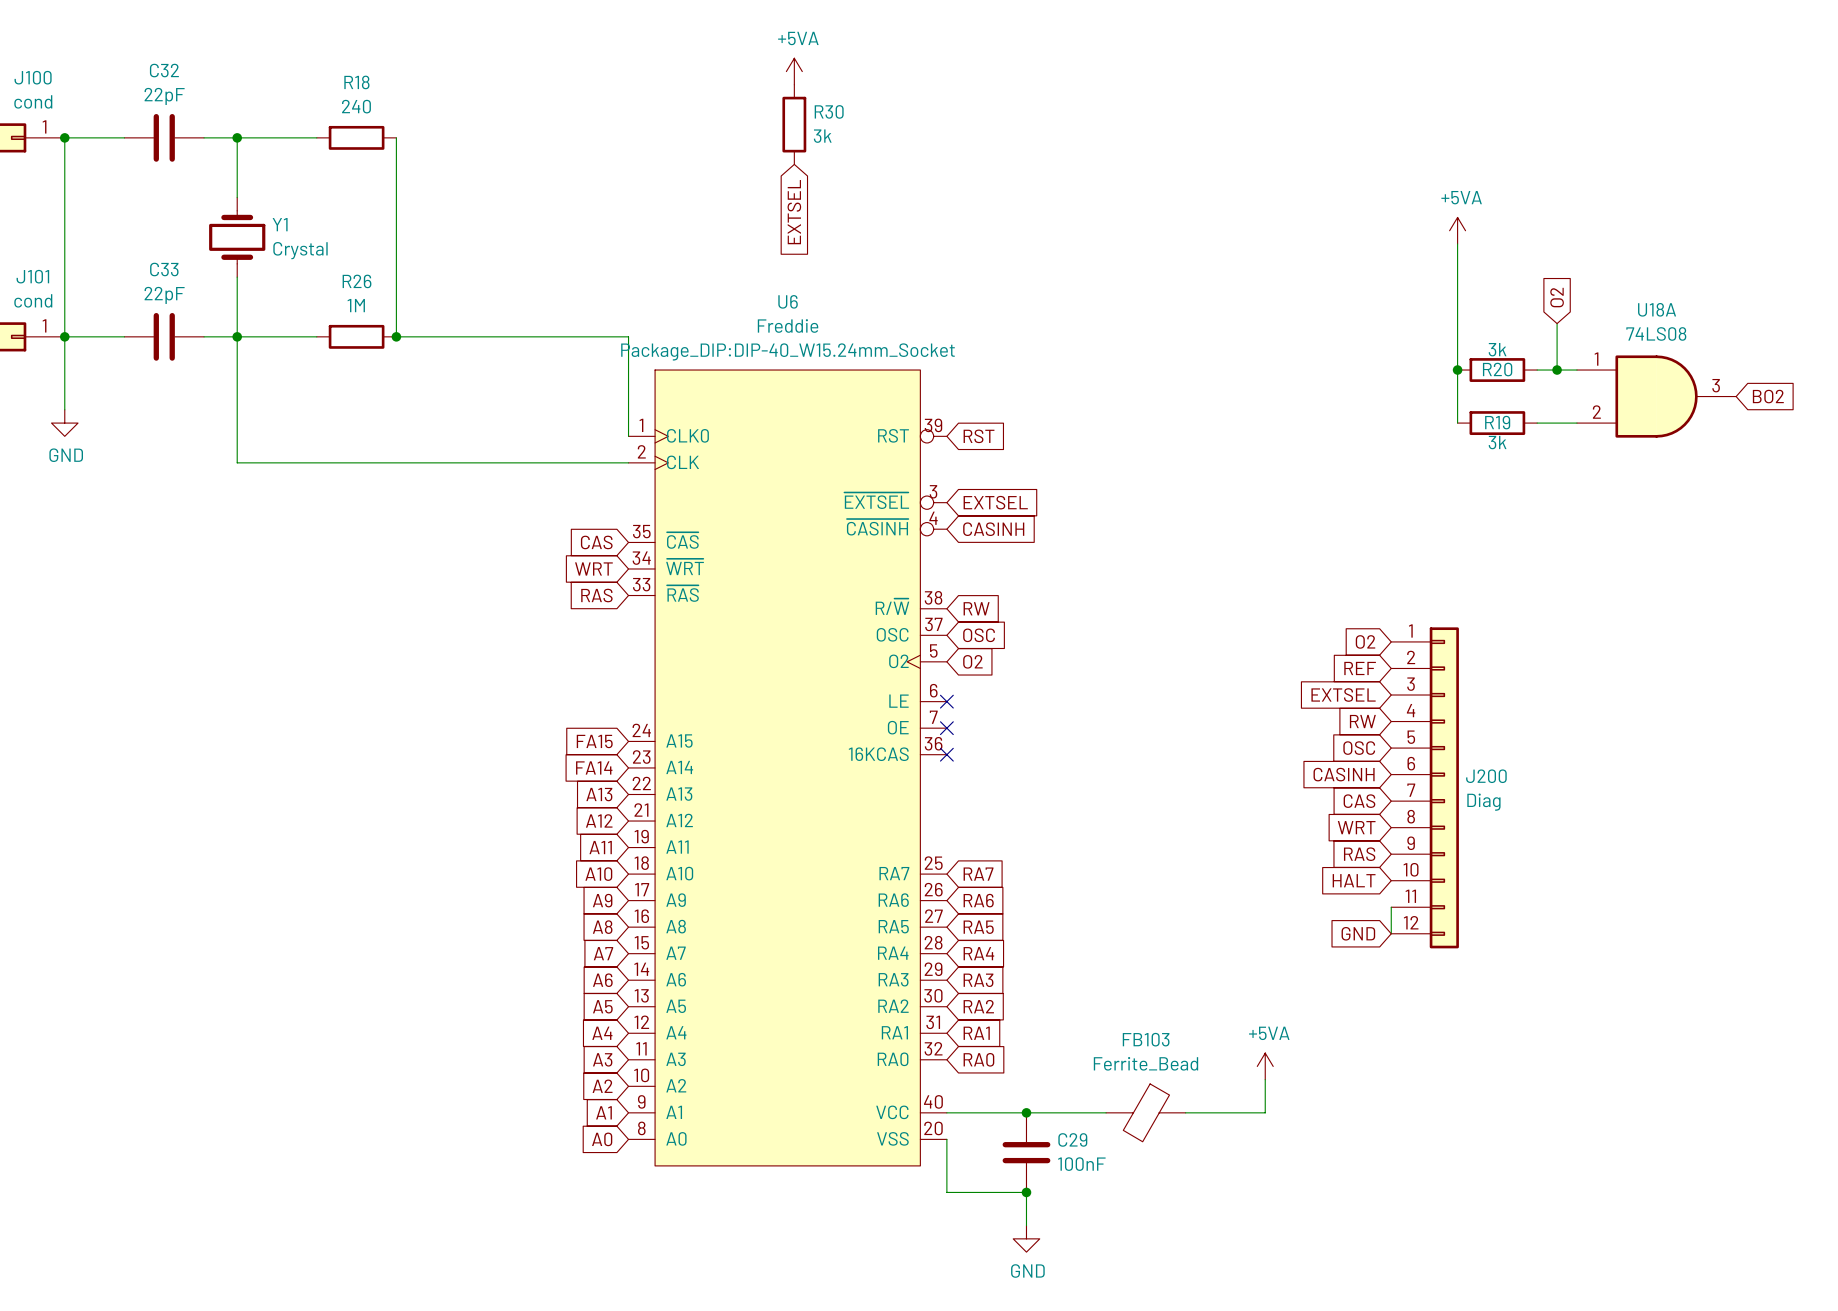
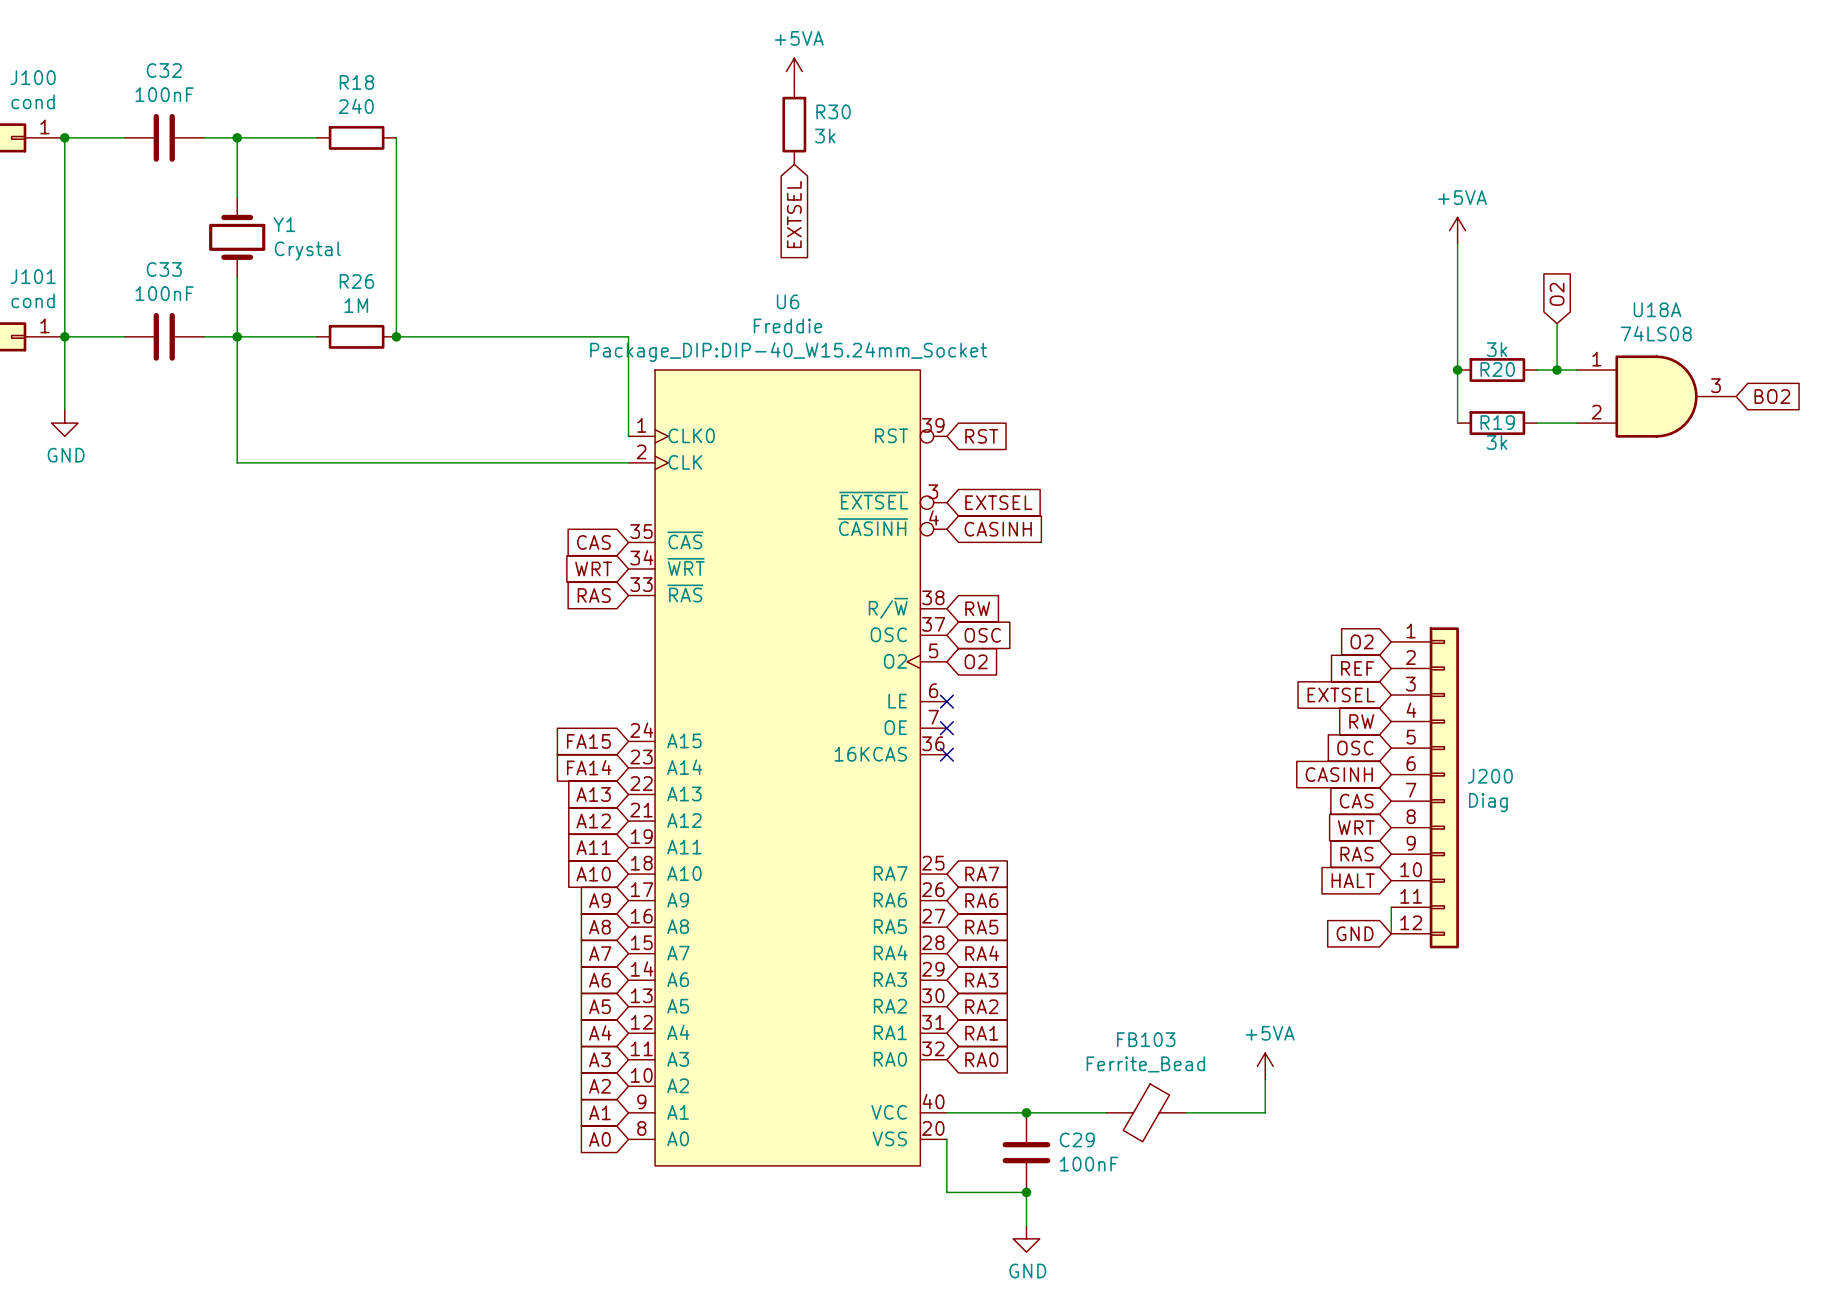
C32 value: 22pF (164, 96) -> 100nF (164, 94)
C33 value: 22pF (164, 295) -> 100nF (164, 293)

